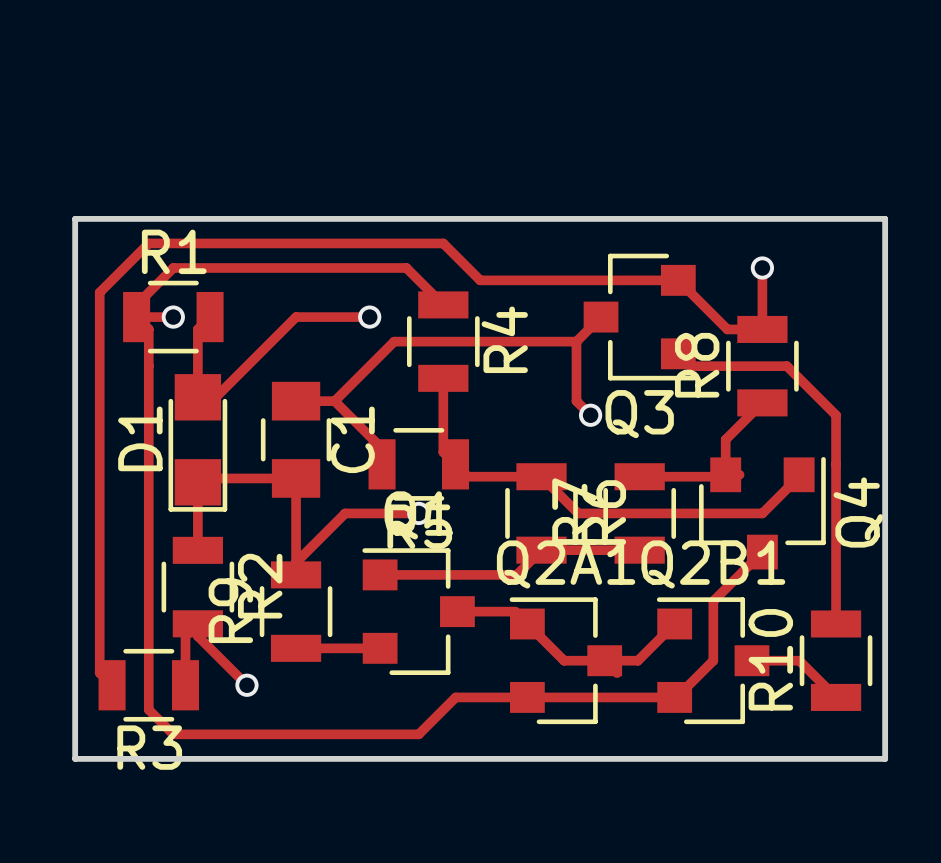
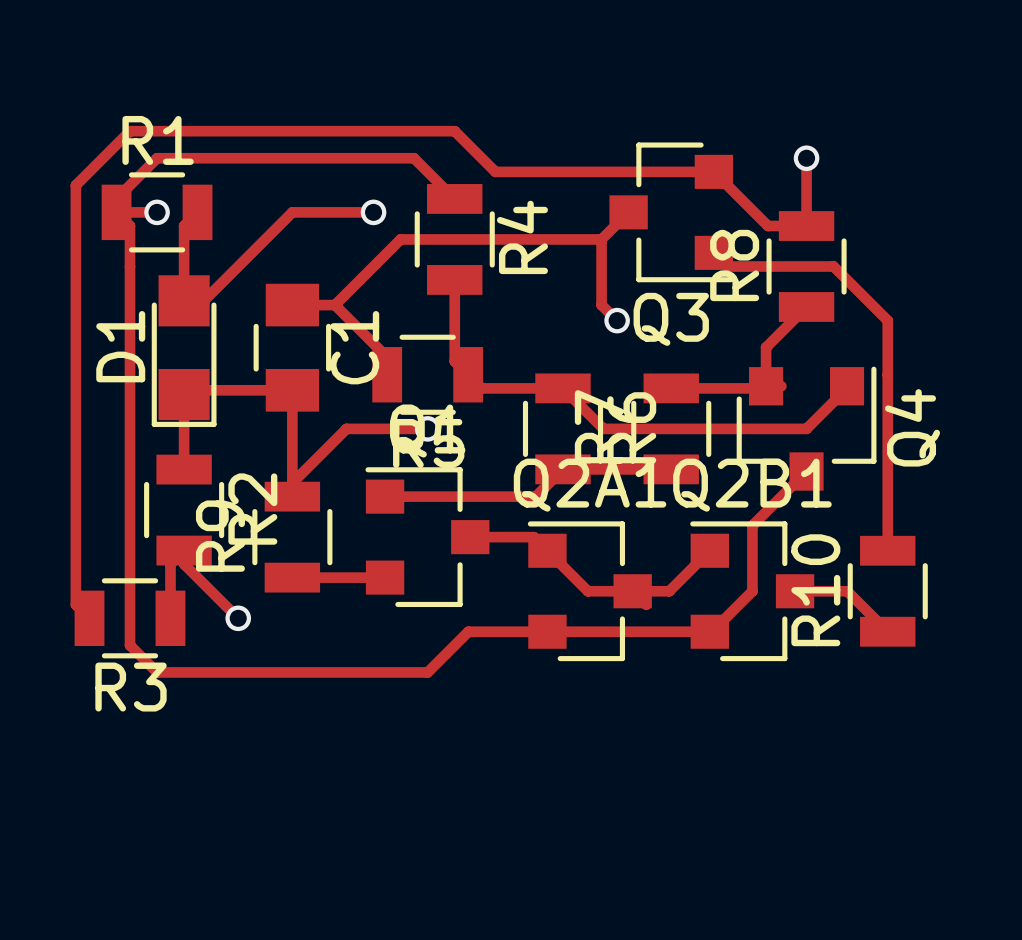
board edge: (75, 218) (75, 758) (885, 758) (885, 218) (75, 218) -> none

